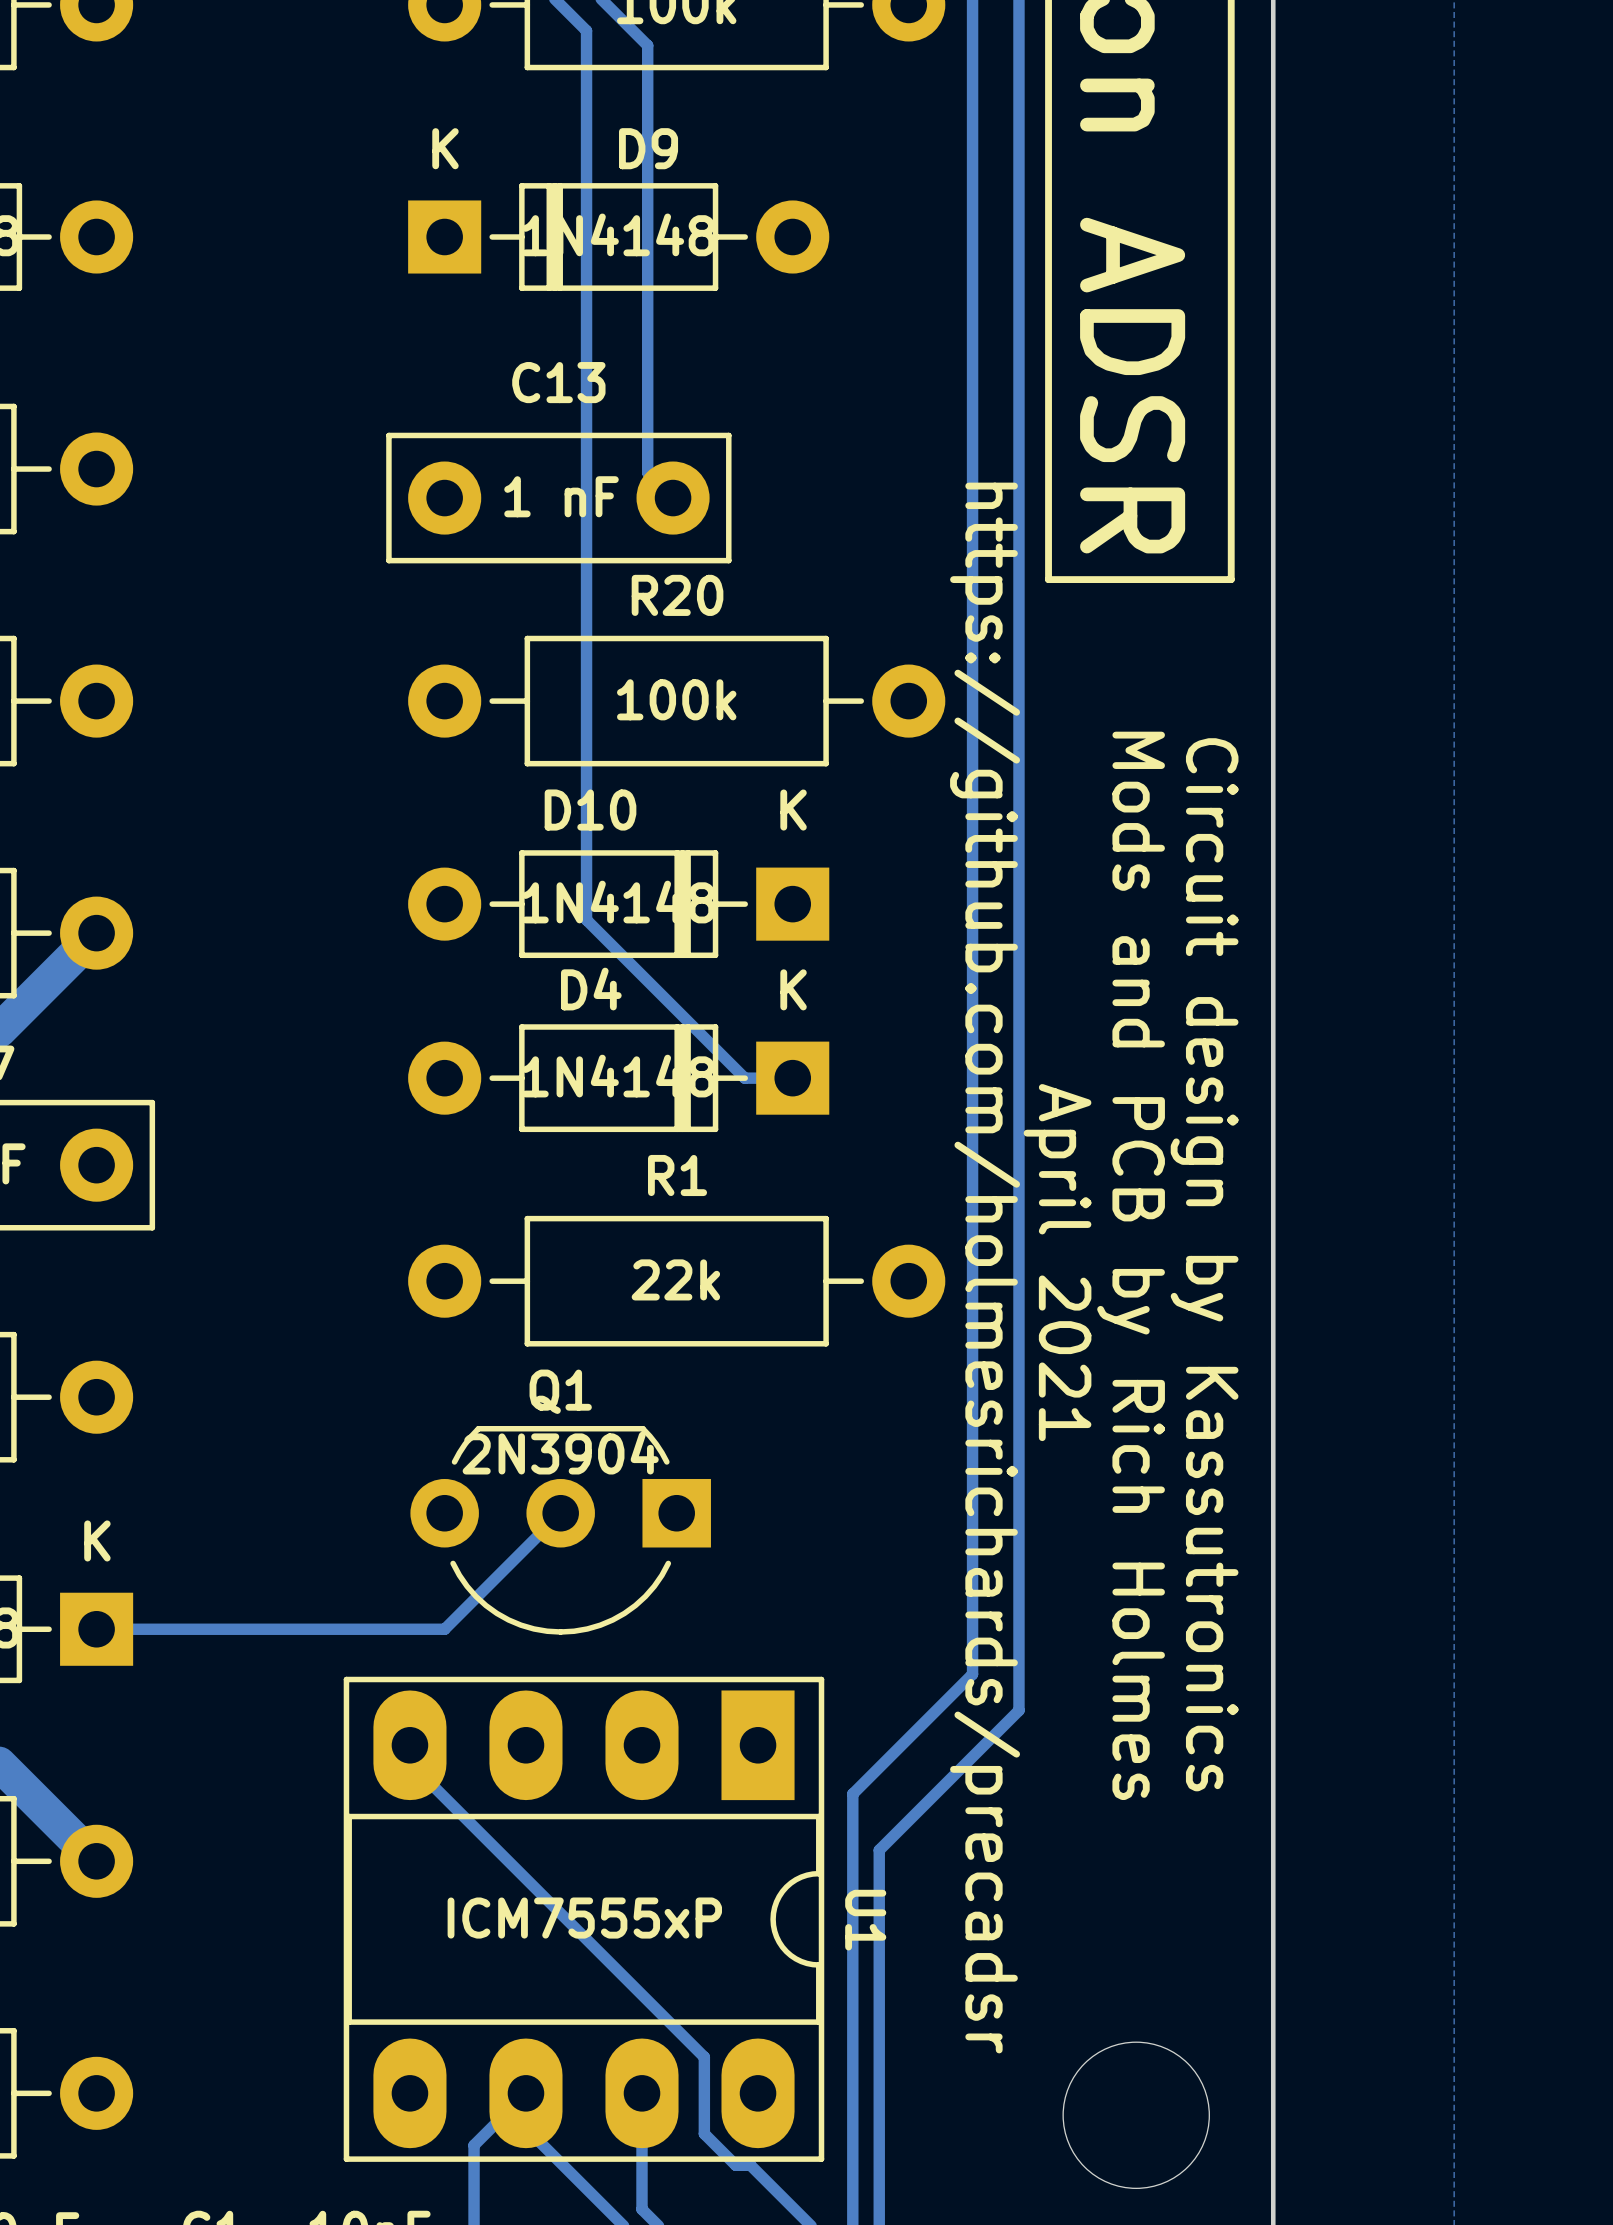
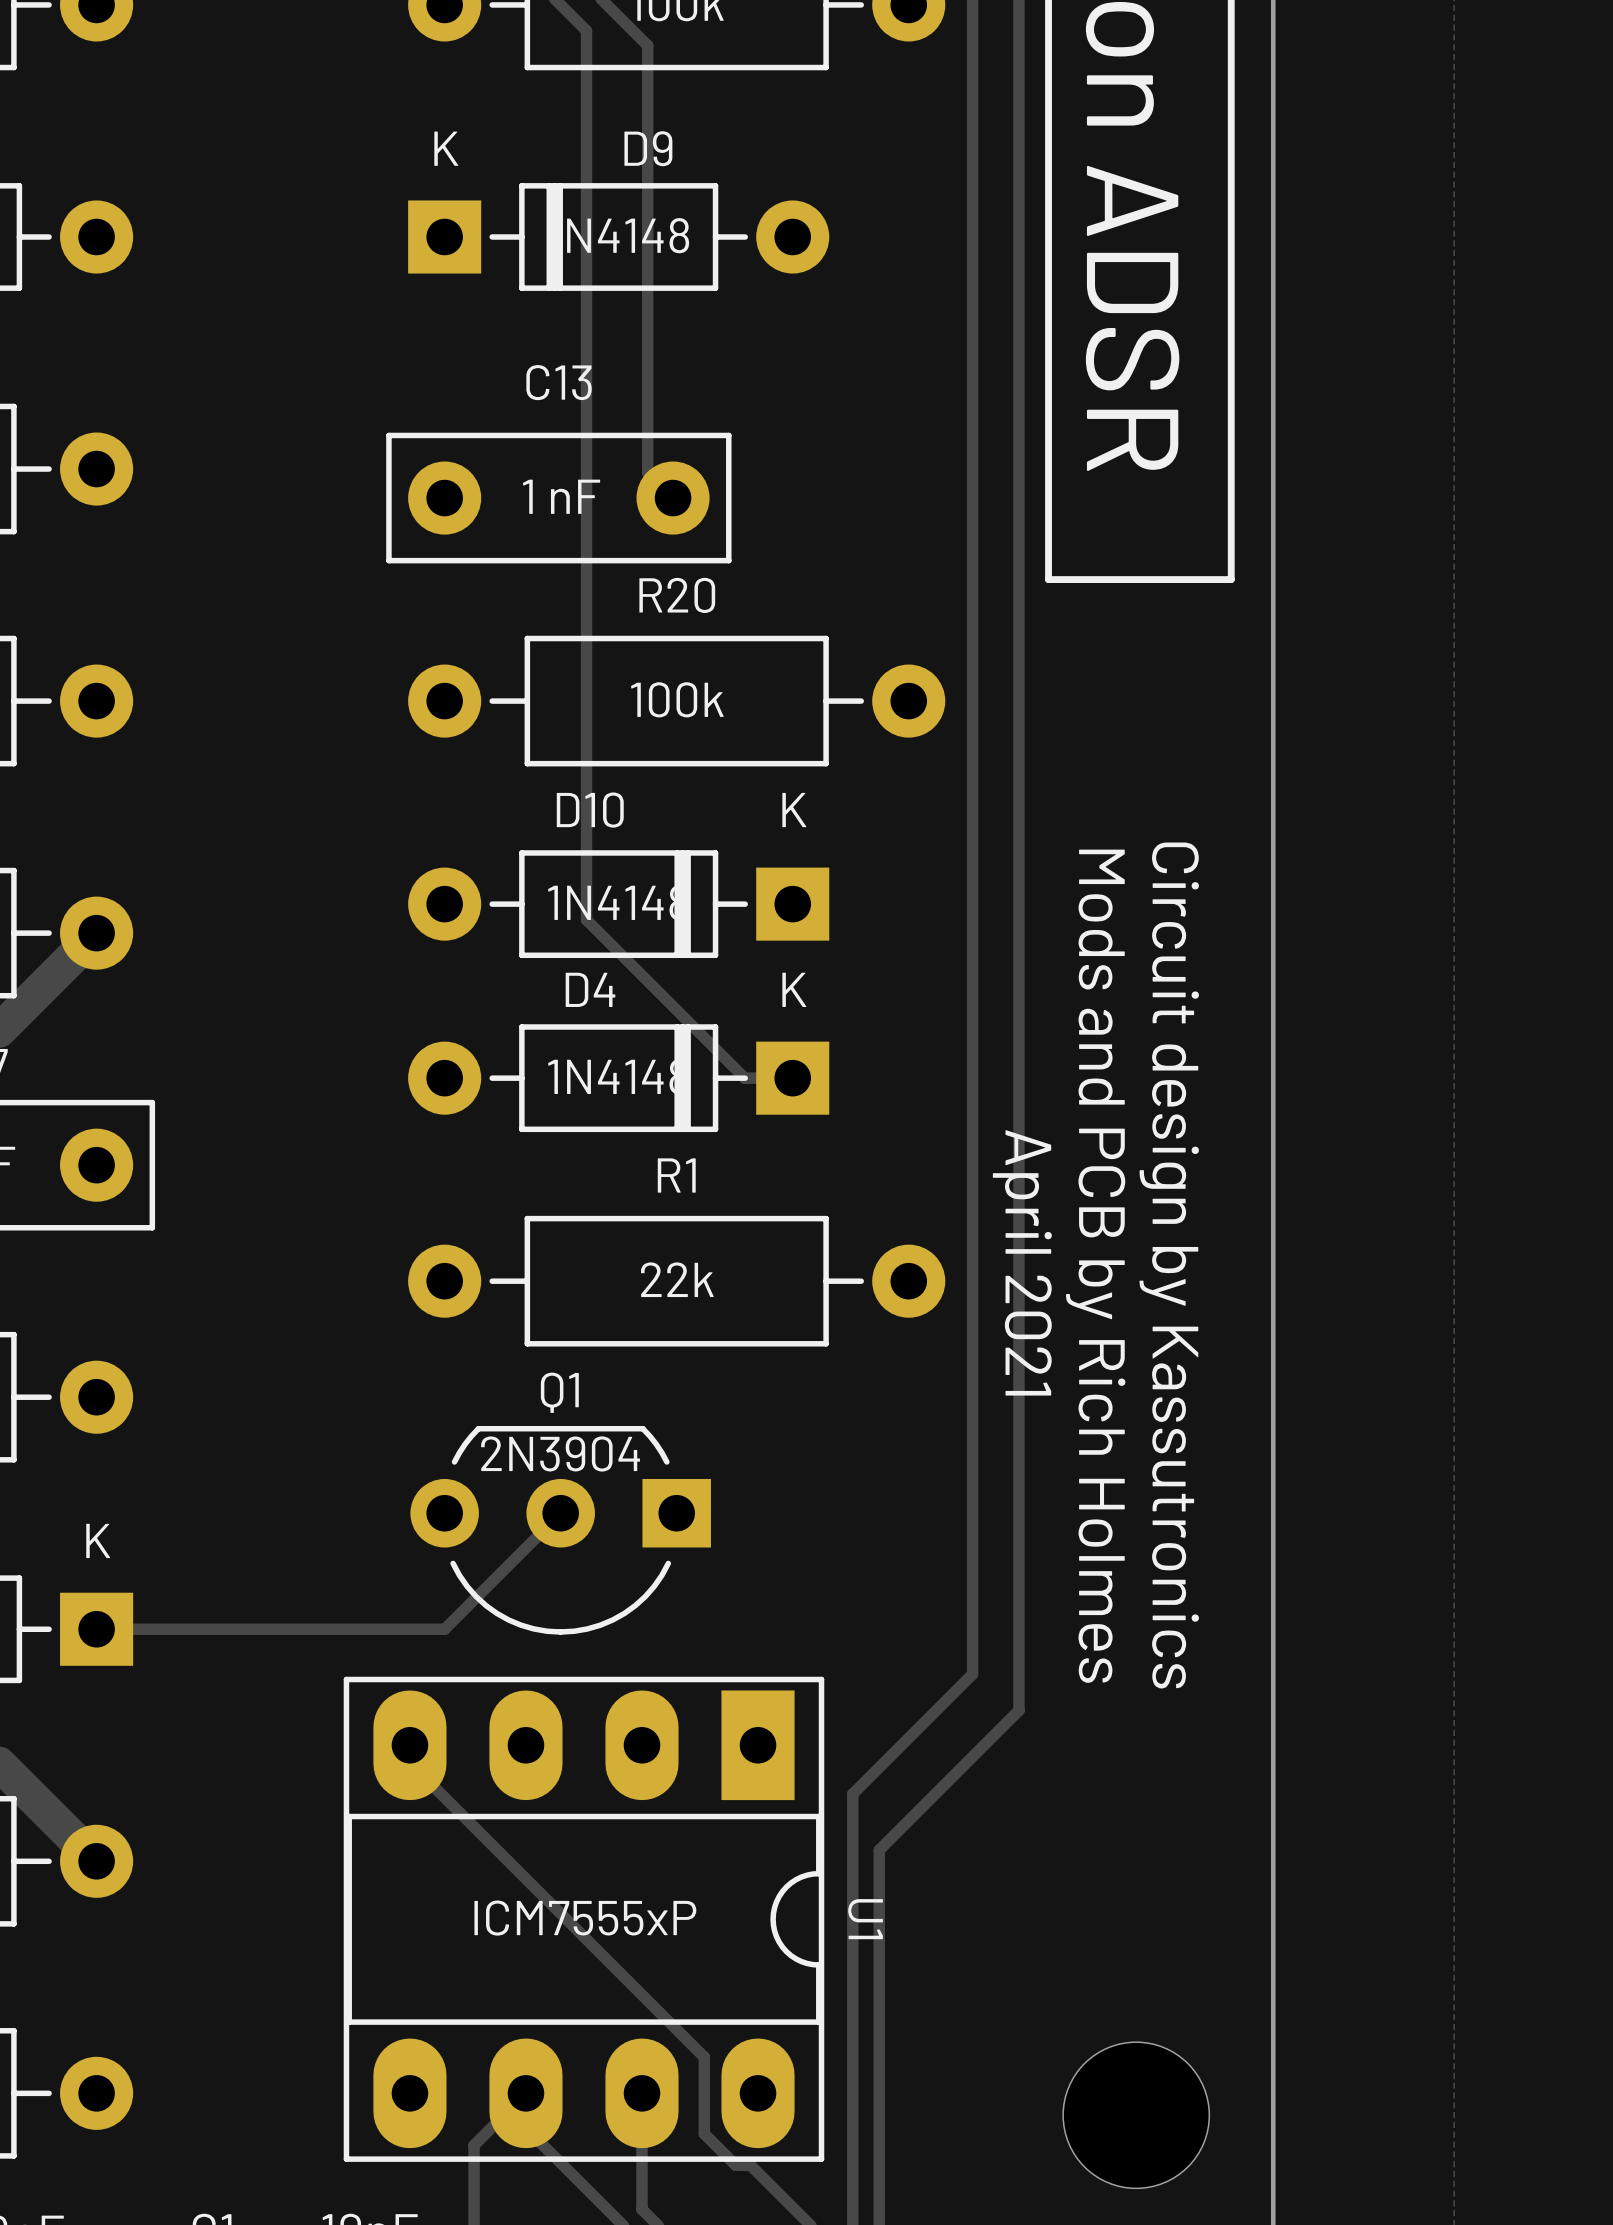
text position: April 2021 (1057, 1262) -> April 2021 (1022, 1262)
text position: Circuit design by Kassutronics (1204, 1264) -> Circuit design by Kassutronics (1169, 1265)
text position: Mods and PCB by Rich Holmes (1131, 1265) -> Mods and PCB by Rich Holmes (1095, 1266)
text: https://github.com/holmesrichards/precadsr (985, 1268) -> none

